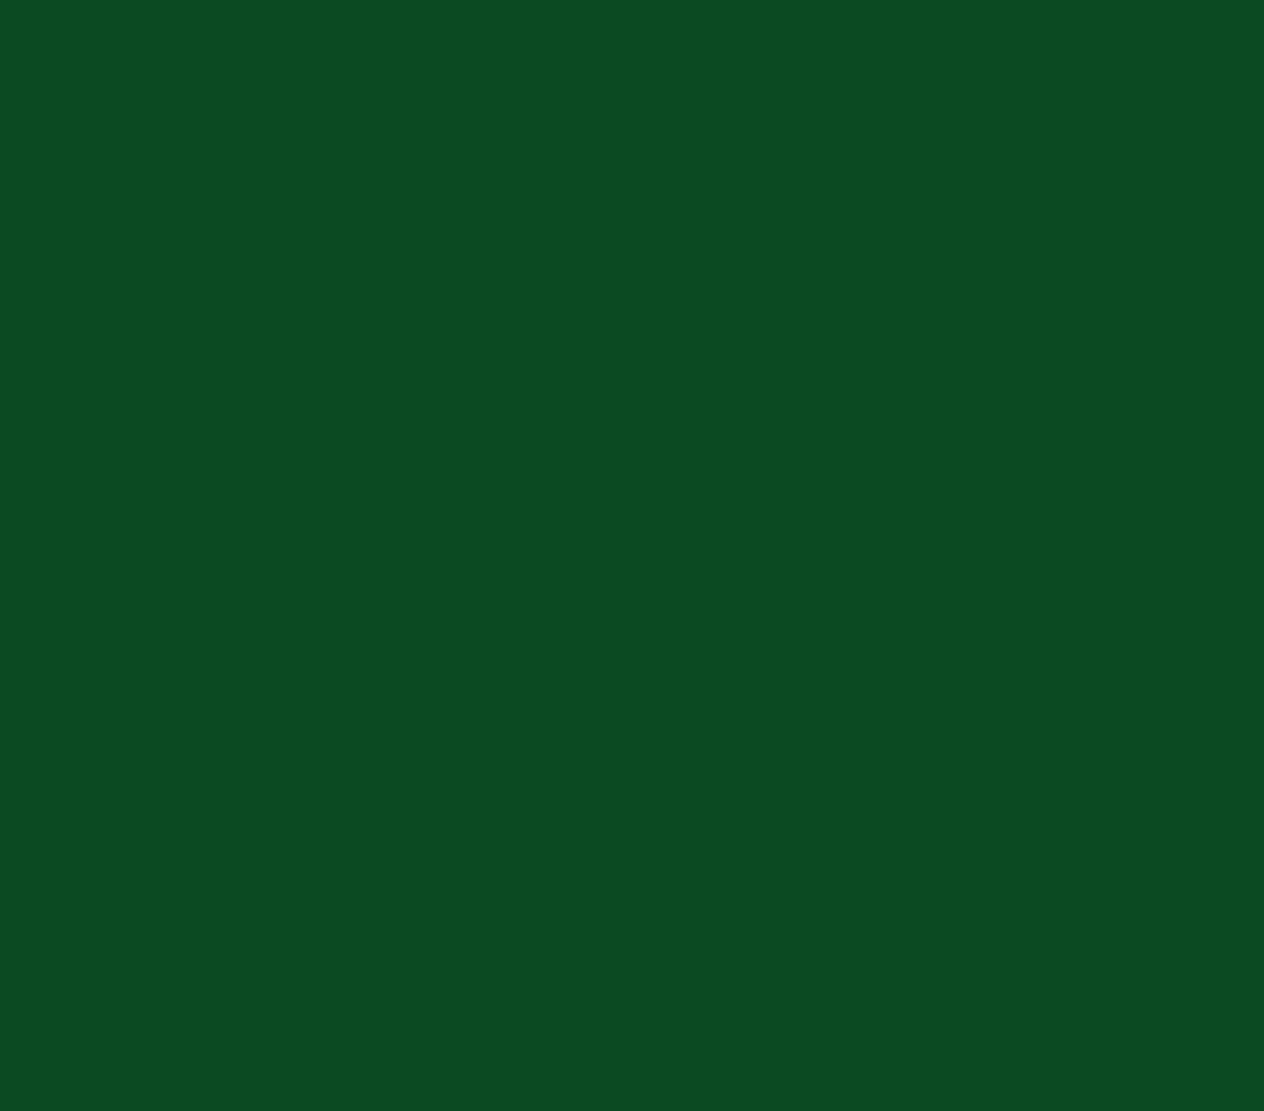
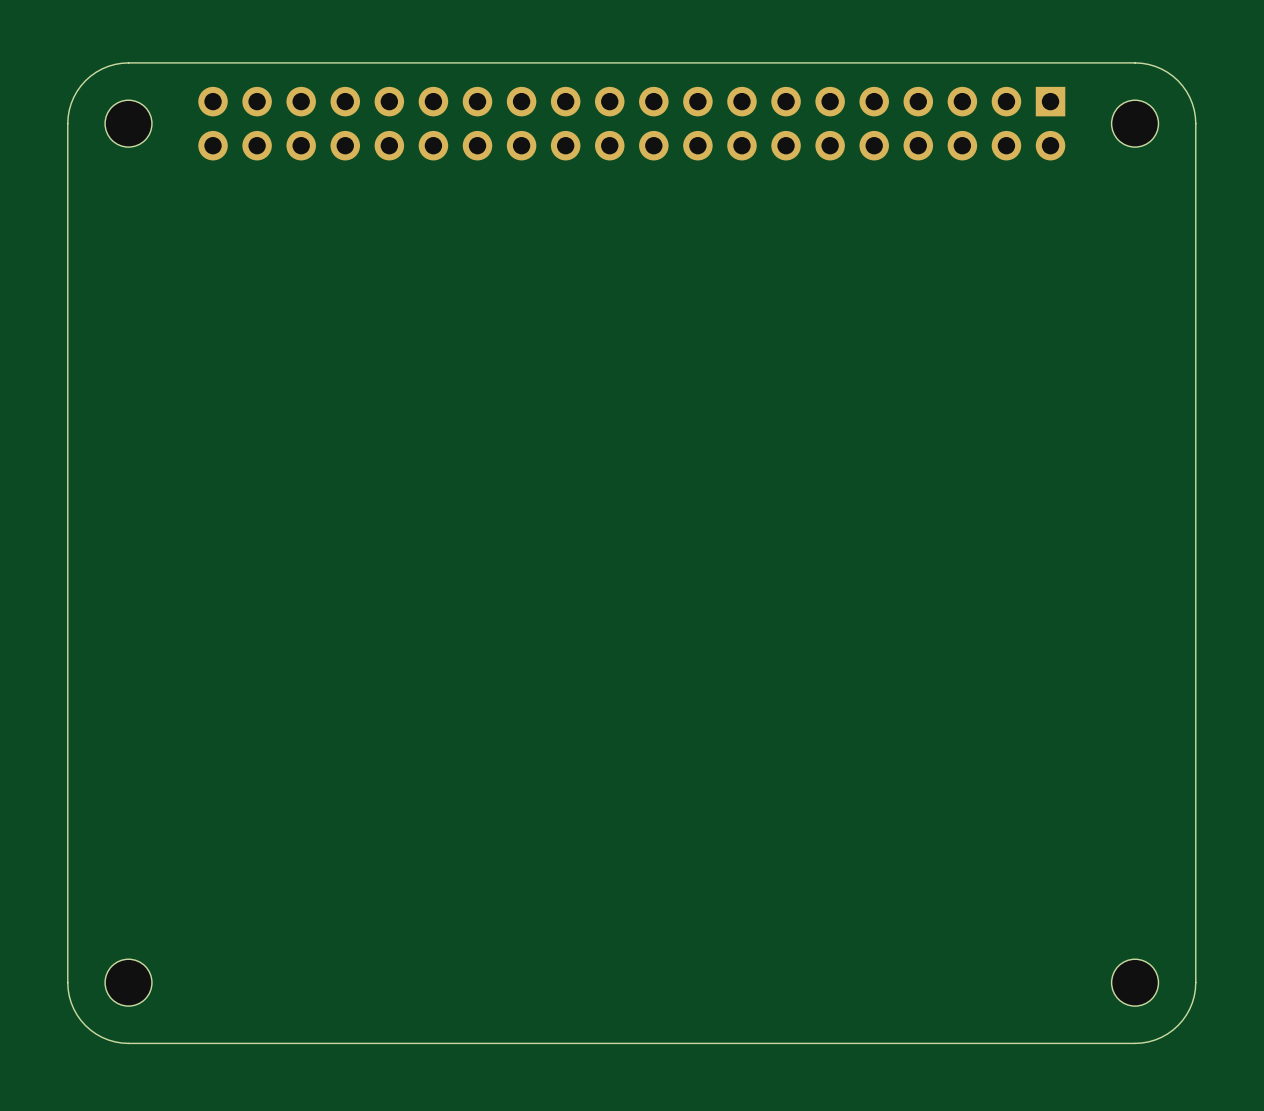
board edge: none -> (1135, 62) (128, 62) (115, 64) (102, 68) (85, 80) (73, 97) (69, 110) (67, 123) (67, 982) (71, 1002) (77, 1014) (85, 1025) (96, 1034) (108, 1040) (128, 1043) (1135, 1043) (1148, 1041) (1161, 1037) (1177, 1025) (1189, 1009) (1194, 996) (1195, 982) (1195, 123) (1192, 103) (1186, 91) (1177, 80) (1161, 68) (1148, 64) (1135, 62)
part: none -> (128, 123)
part: none -> (631, 123)
part: none -> (1135, 123)
part: none -> (128, 982)
part: none -> (1135, 982)

